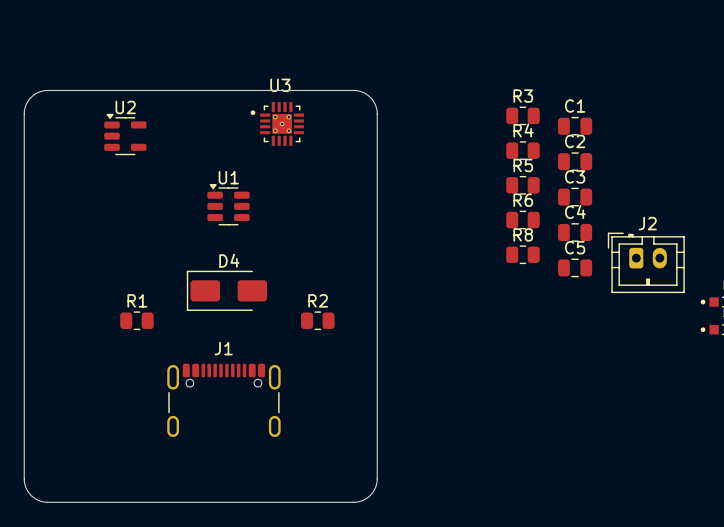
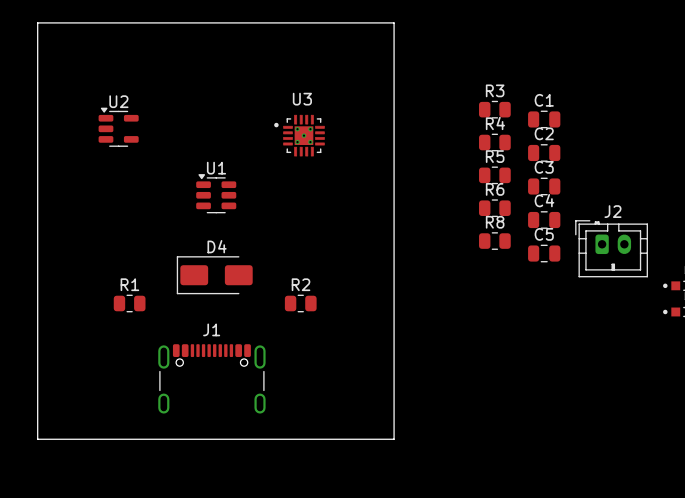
board edge: (47, 90) (353, 90) (363, 92) (372, 99) (377, 114) (377, 478) (374, 488) (368, 497) (353, 502) (47, 502) (37, 499) (29, 493) (24, 478) (24, 114) (26, 103) (31, 97) (37, 92) (47, 90) -> (37, 22) (37, 439) (394, 439) (394, 22) (37, 22)
U3 position: (277, 123) -> (299, 135)

